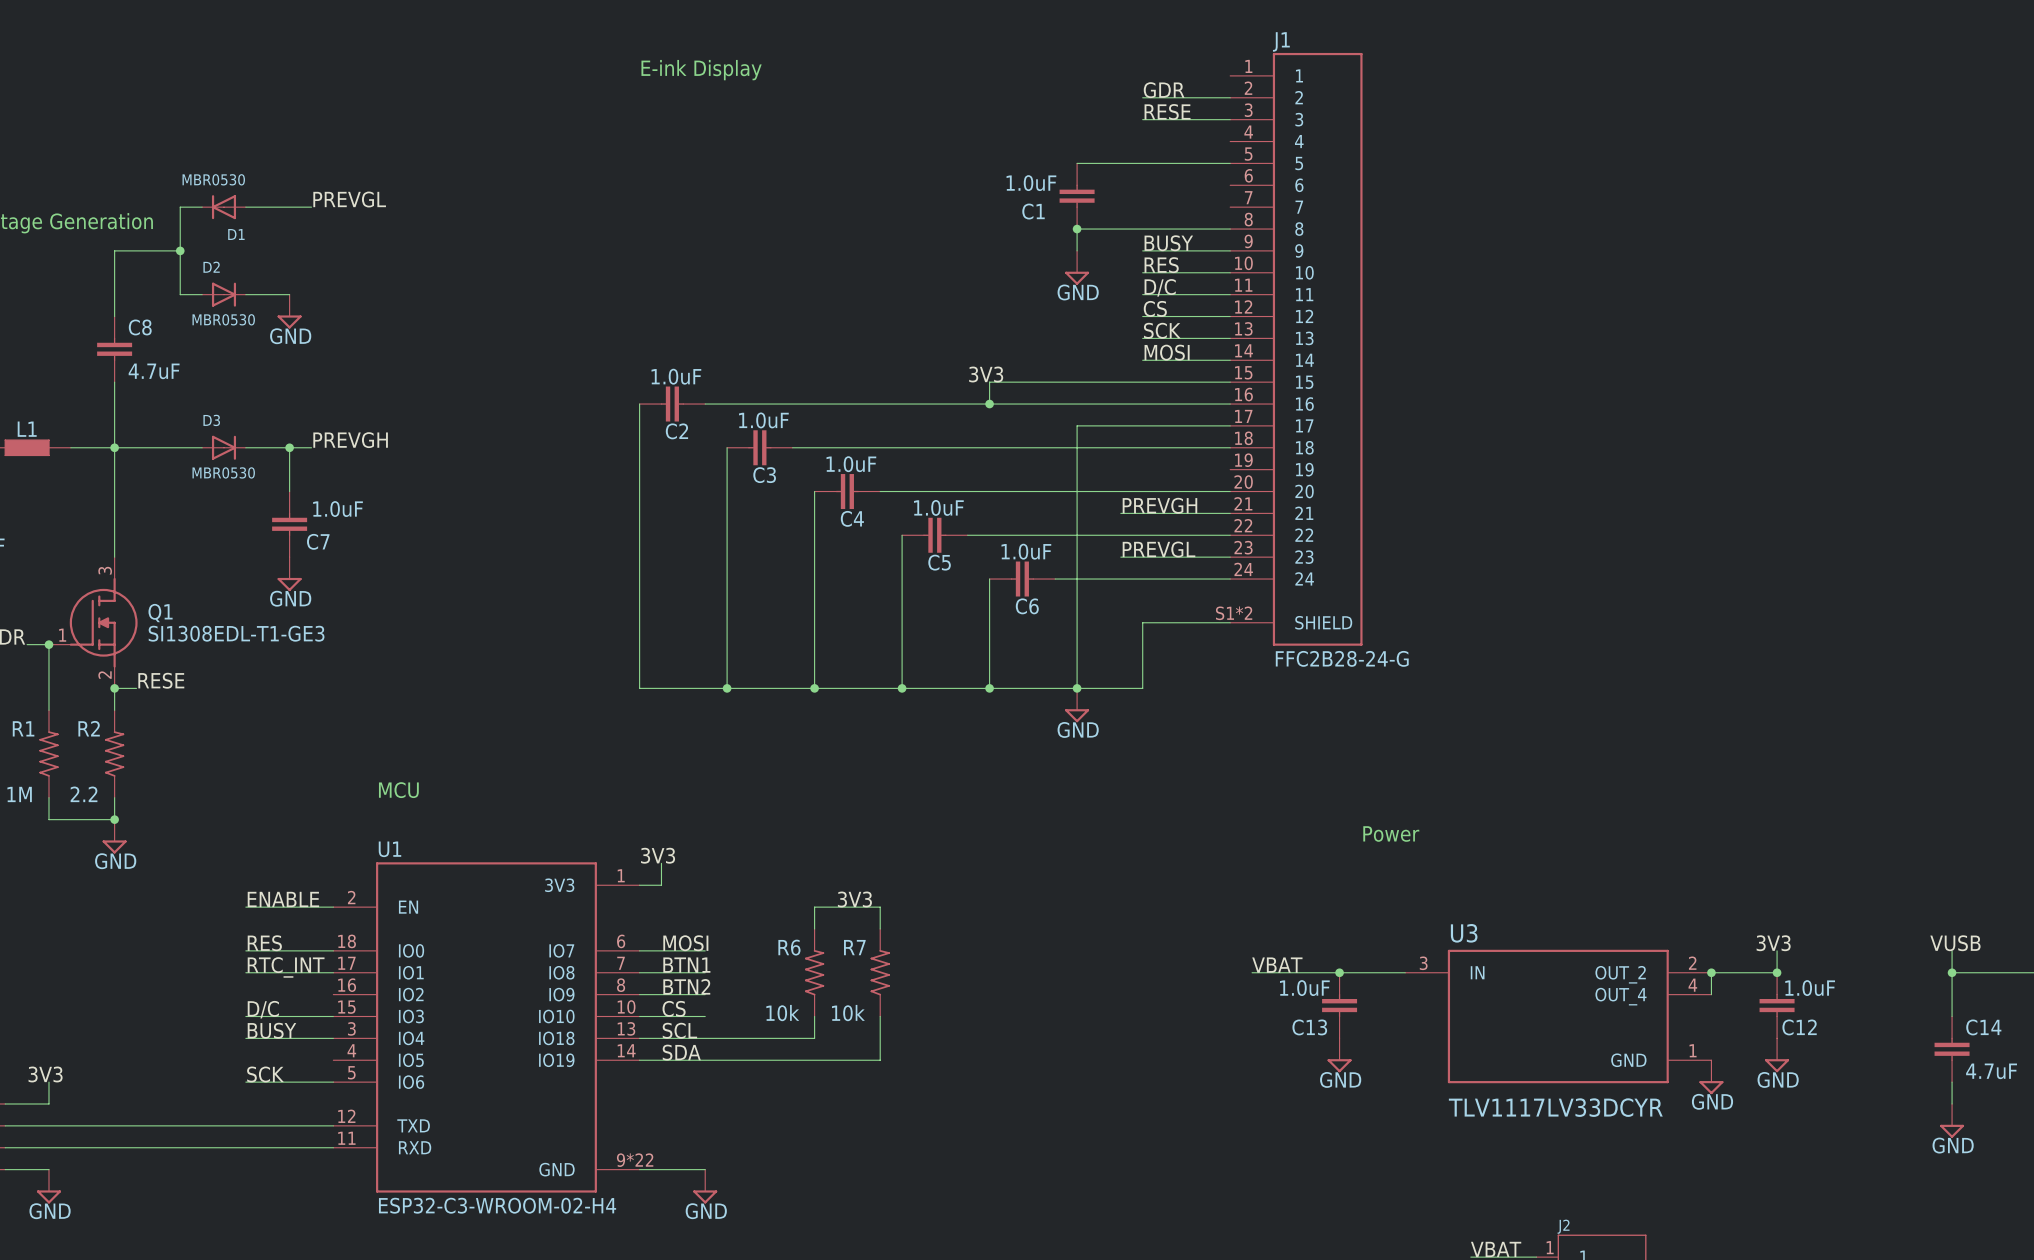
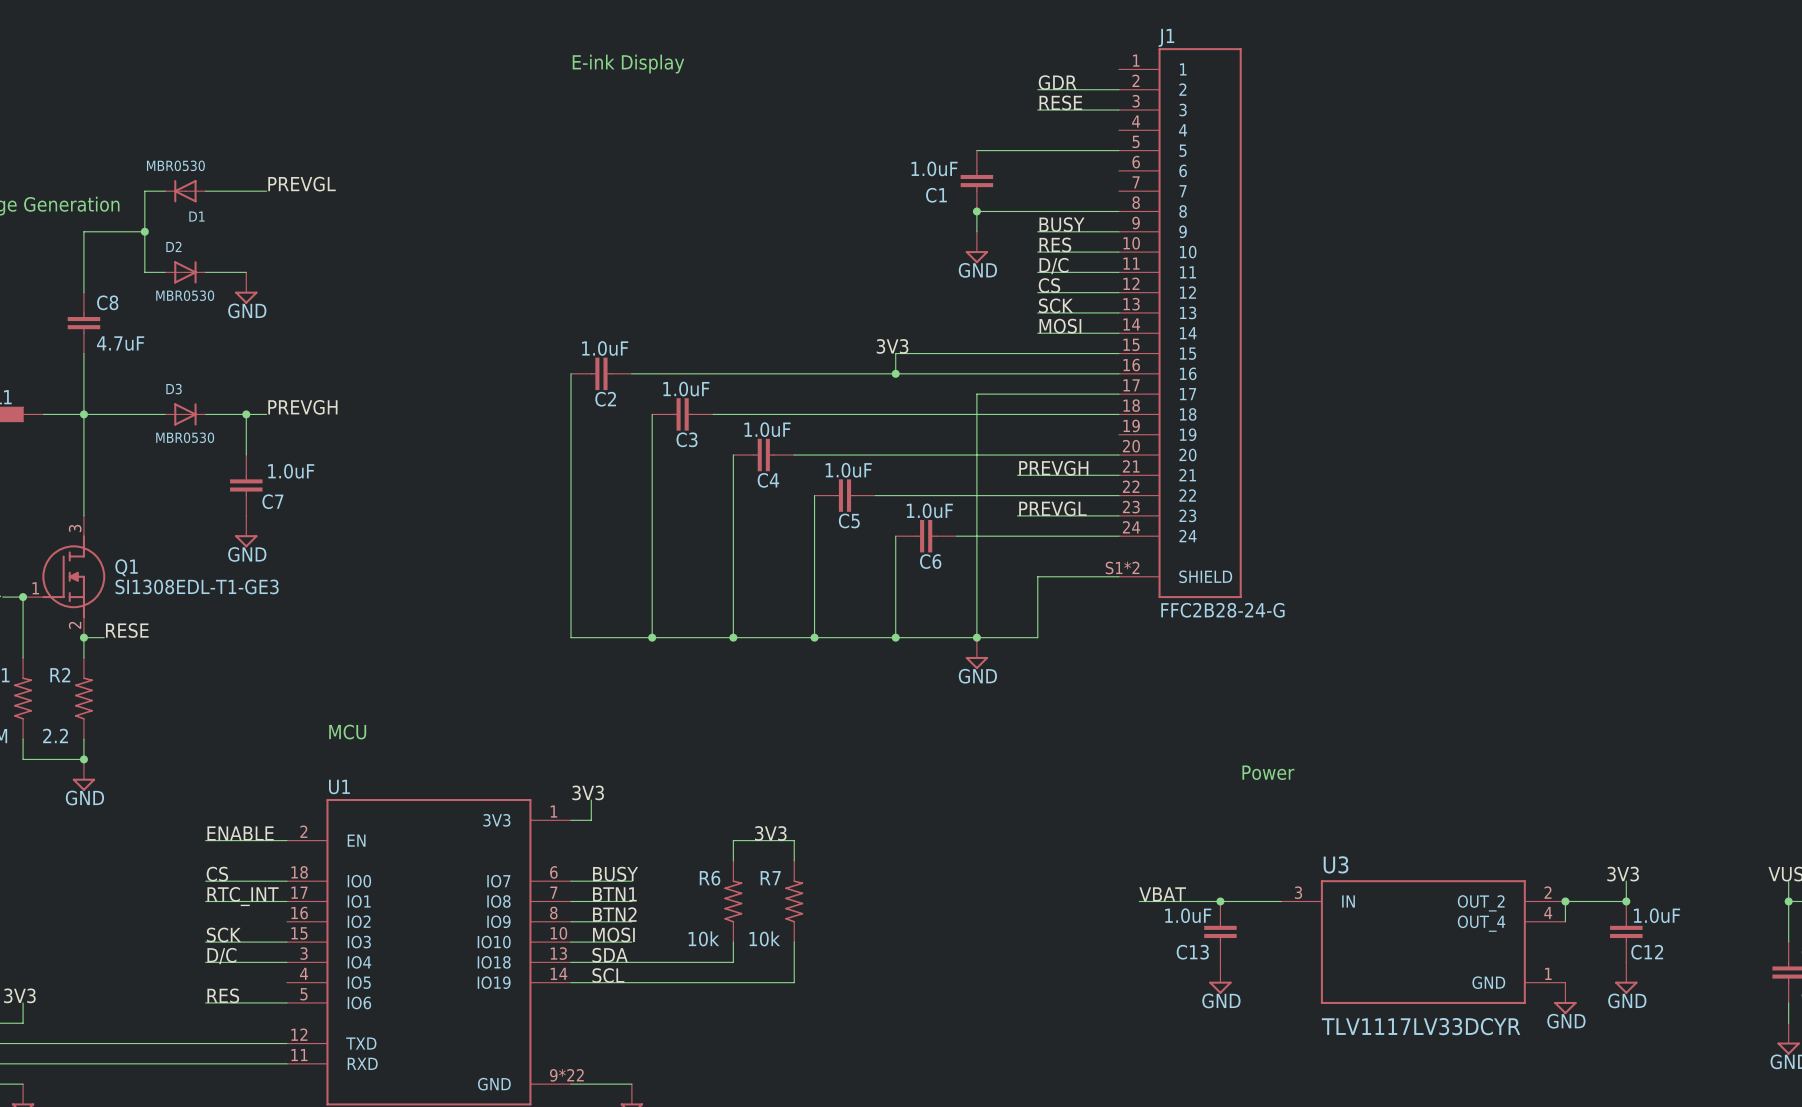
label: RES (264, 943) -> CS (217, 874)
label: MOSI (685, 943) -> BUSY (615, 874)
label: CS (674, 1008) -> MOSI (613, 934)
label: D/C (263, 1009) -> SCK (223, 934)
label: BUSY (271, 1030) -> D/C (221, 956)
label: SCL (679, 1030) -> SDA (610, 955)
label: SDA (681, 1052) -> SCL (608, 975)
label: SCK (265, 1074) -> RES (223, 995)

